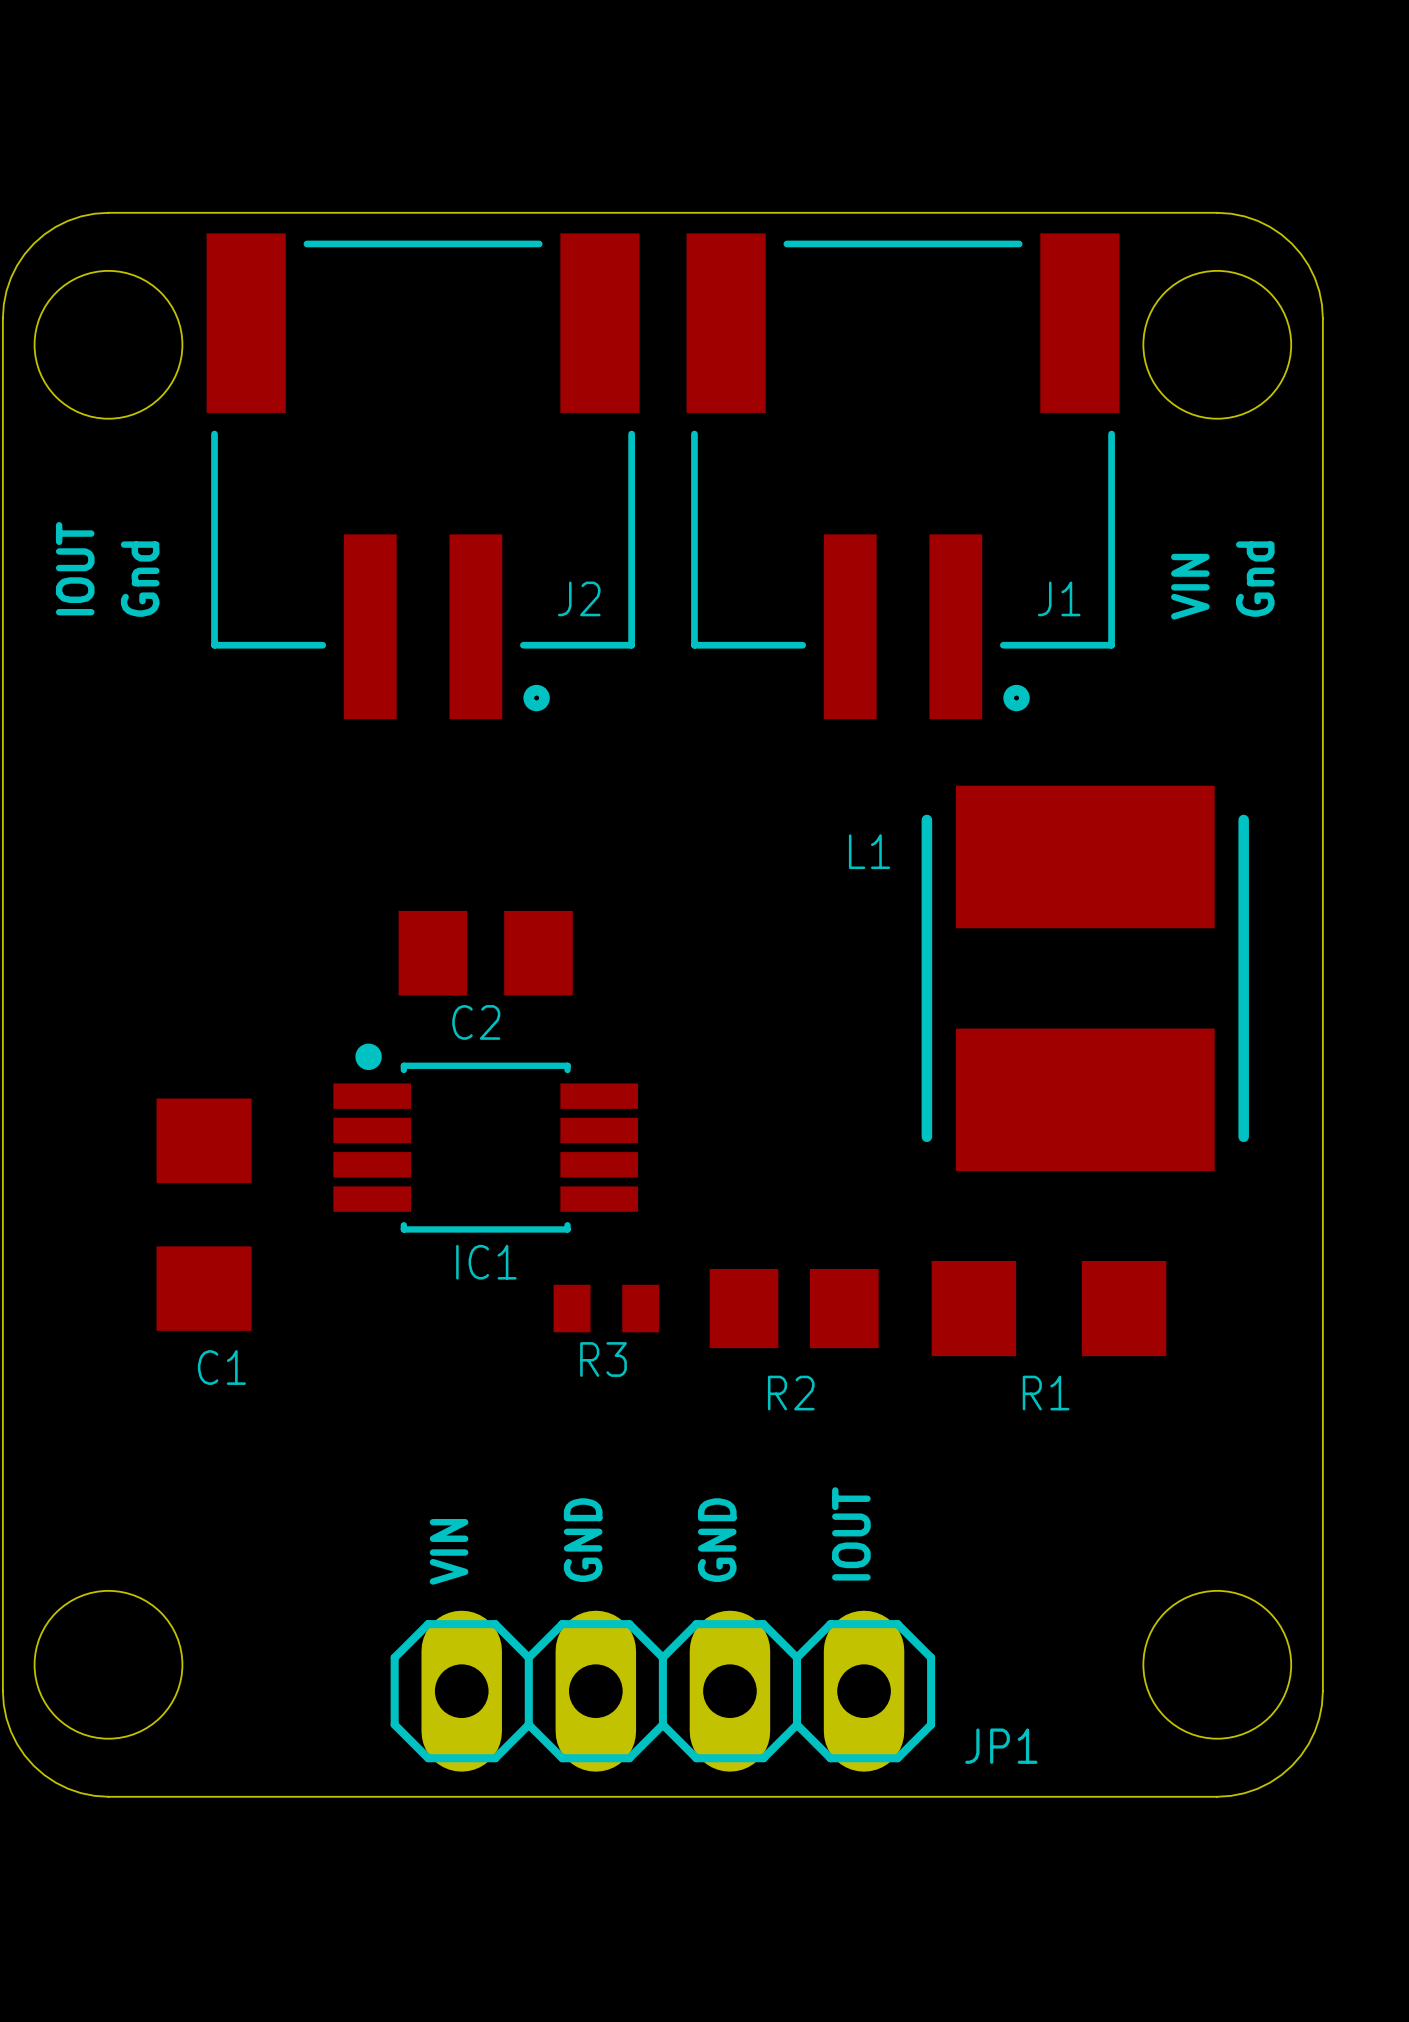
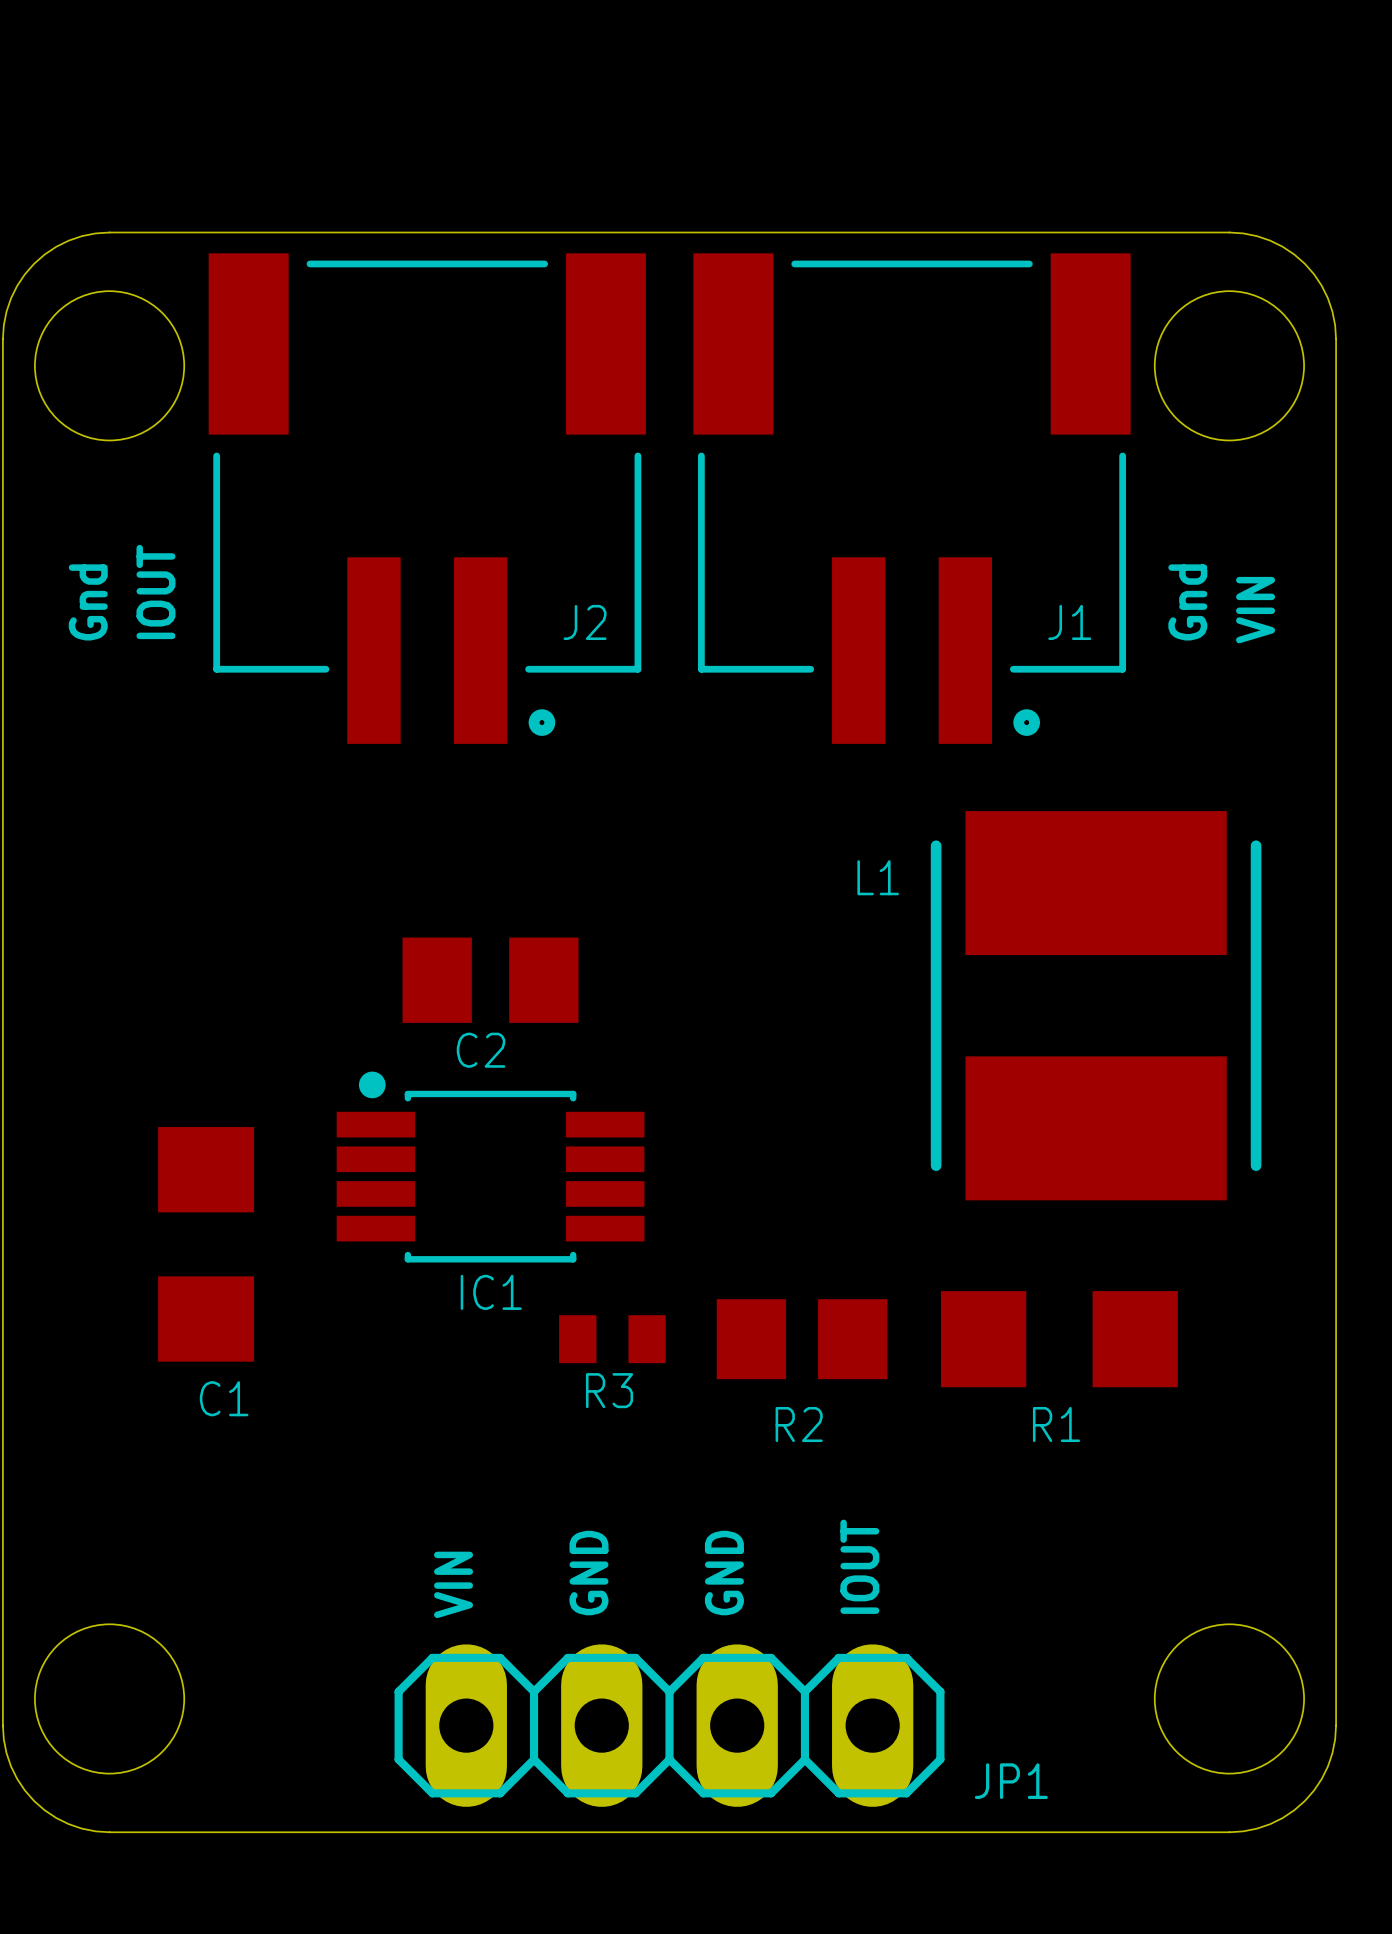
text position: IOUT (75, 568) -> IOUT (155, 591)
text position: Gnd (140, 579) -> Gnd (88, 602)
text position: Gnd (1255, 579) -> Gnd (1187, 602)
text position: VIN (1190, 586) -> VIN (1255, 610)

